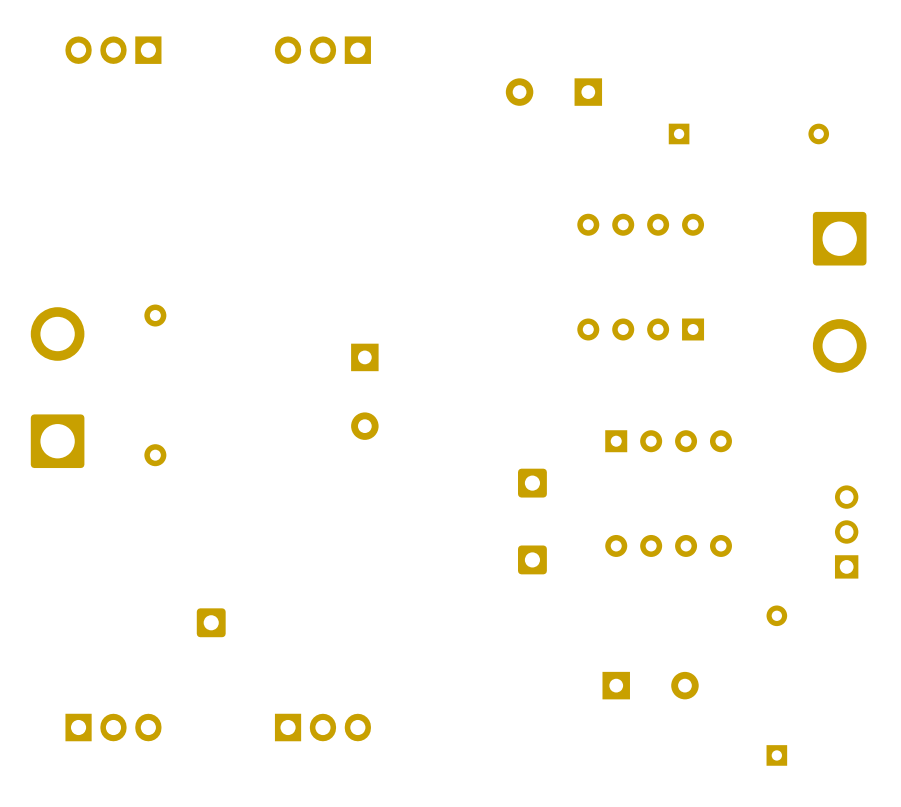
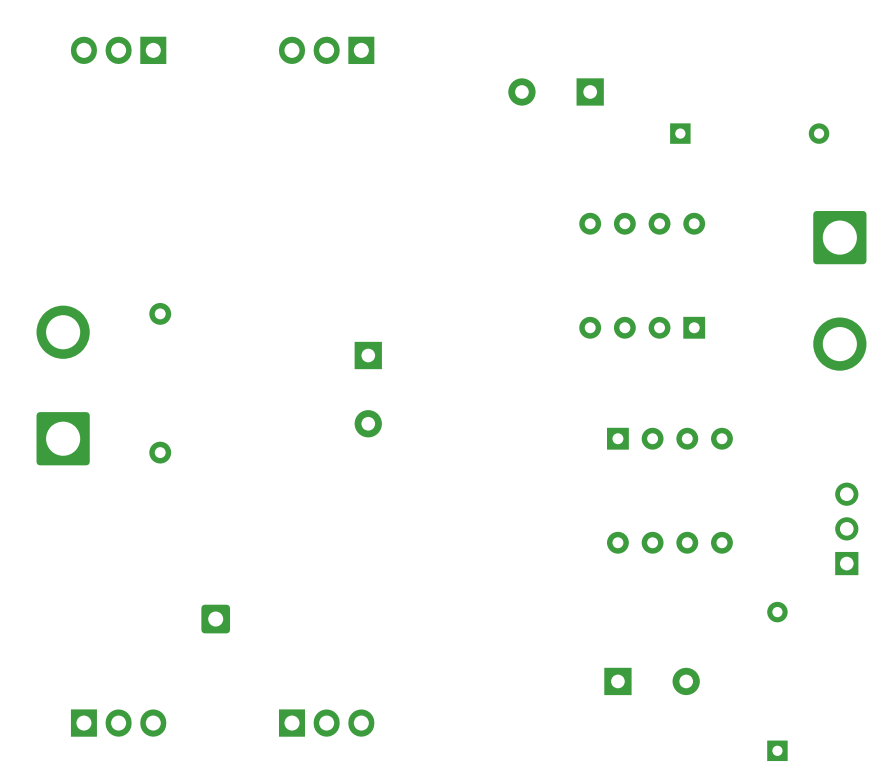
part: (532, 483) -> none
part: (532, 559) -> none

